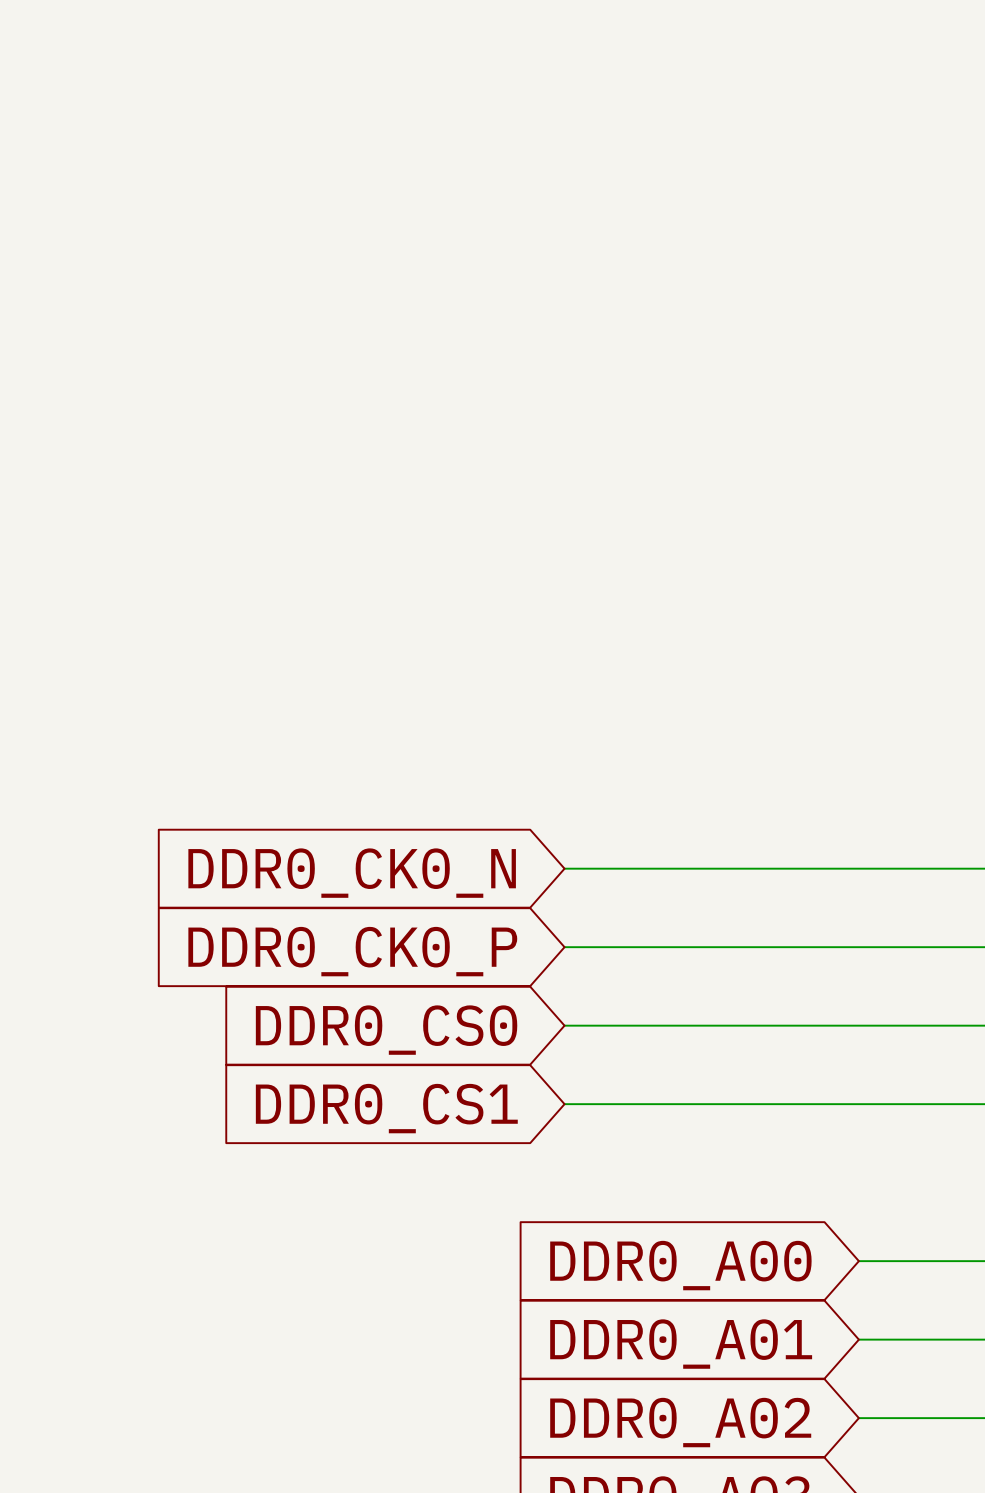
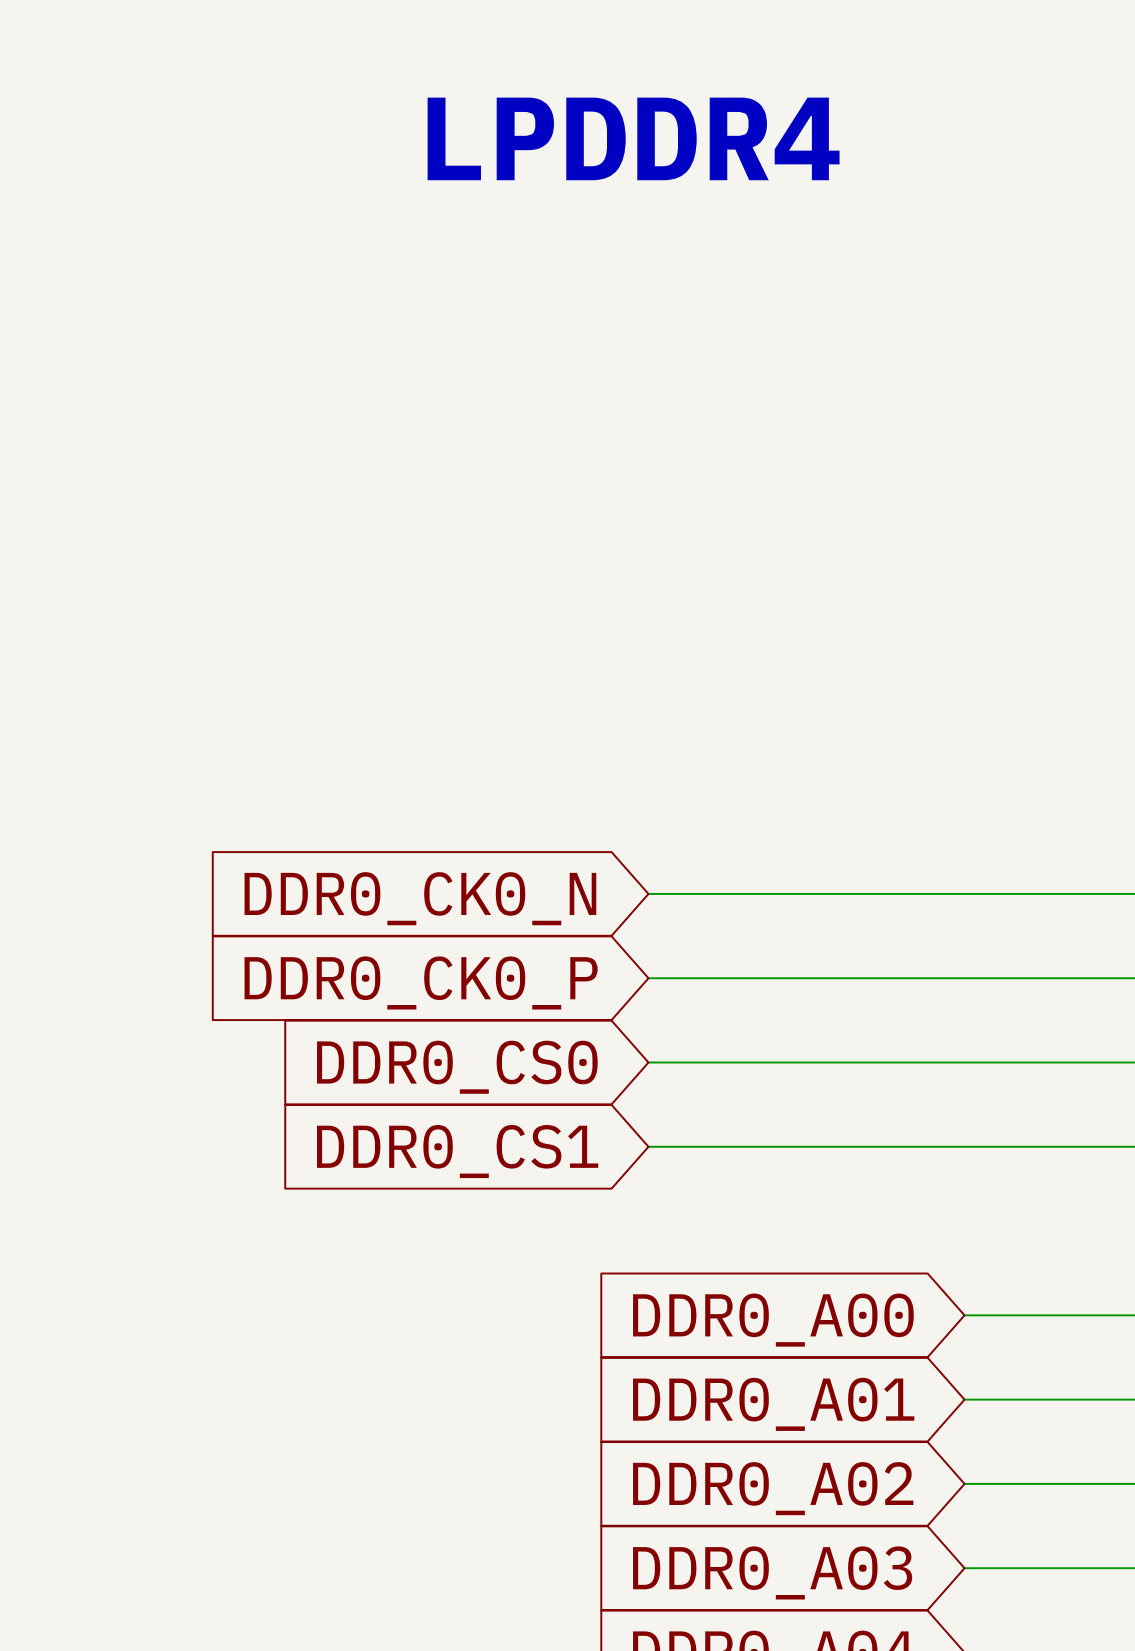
text: none -> LPDDR4 (633, 138)

